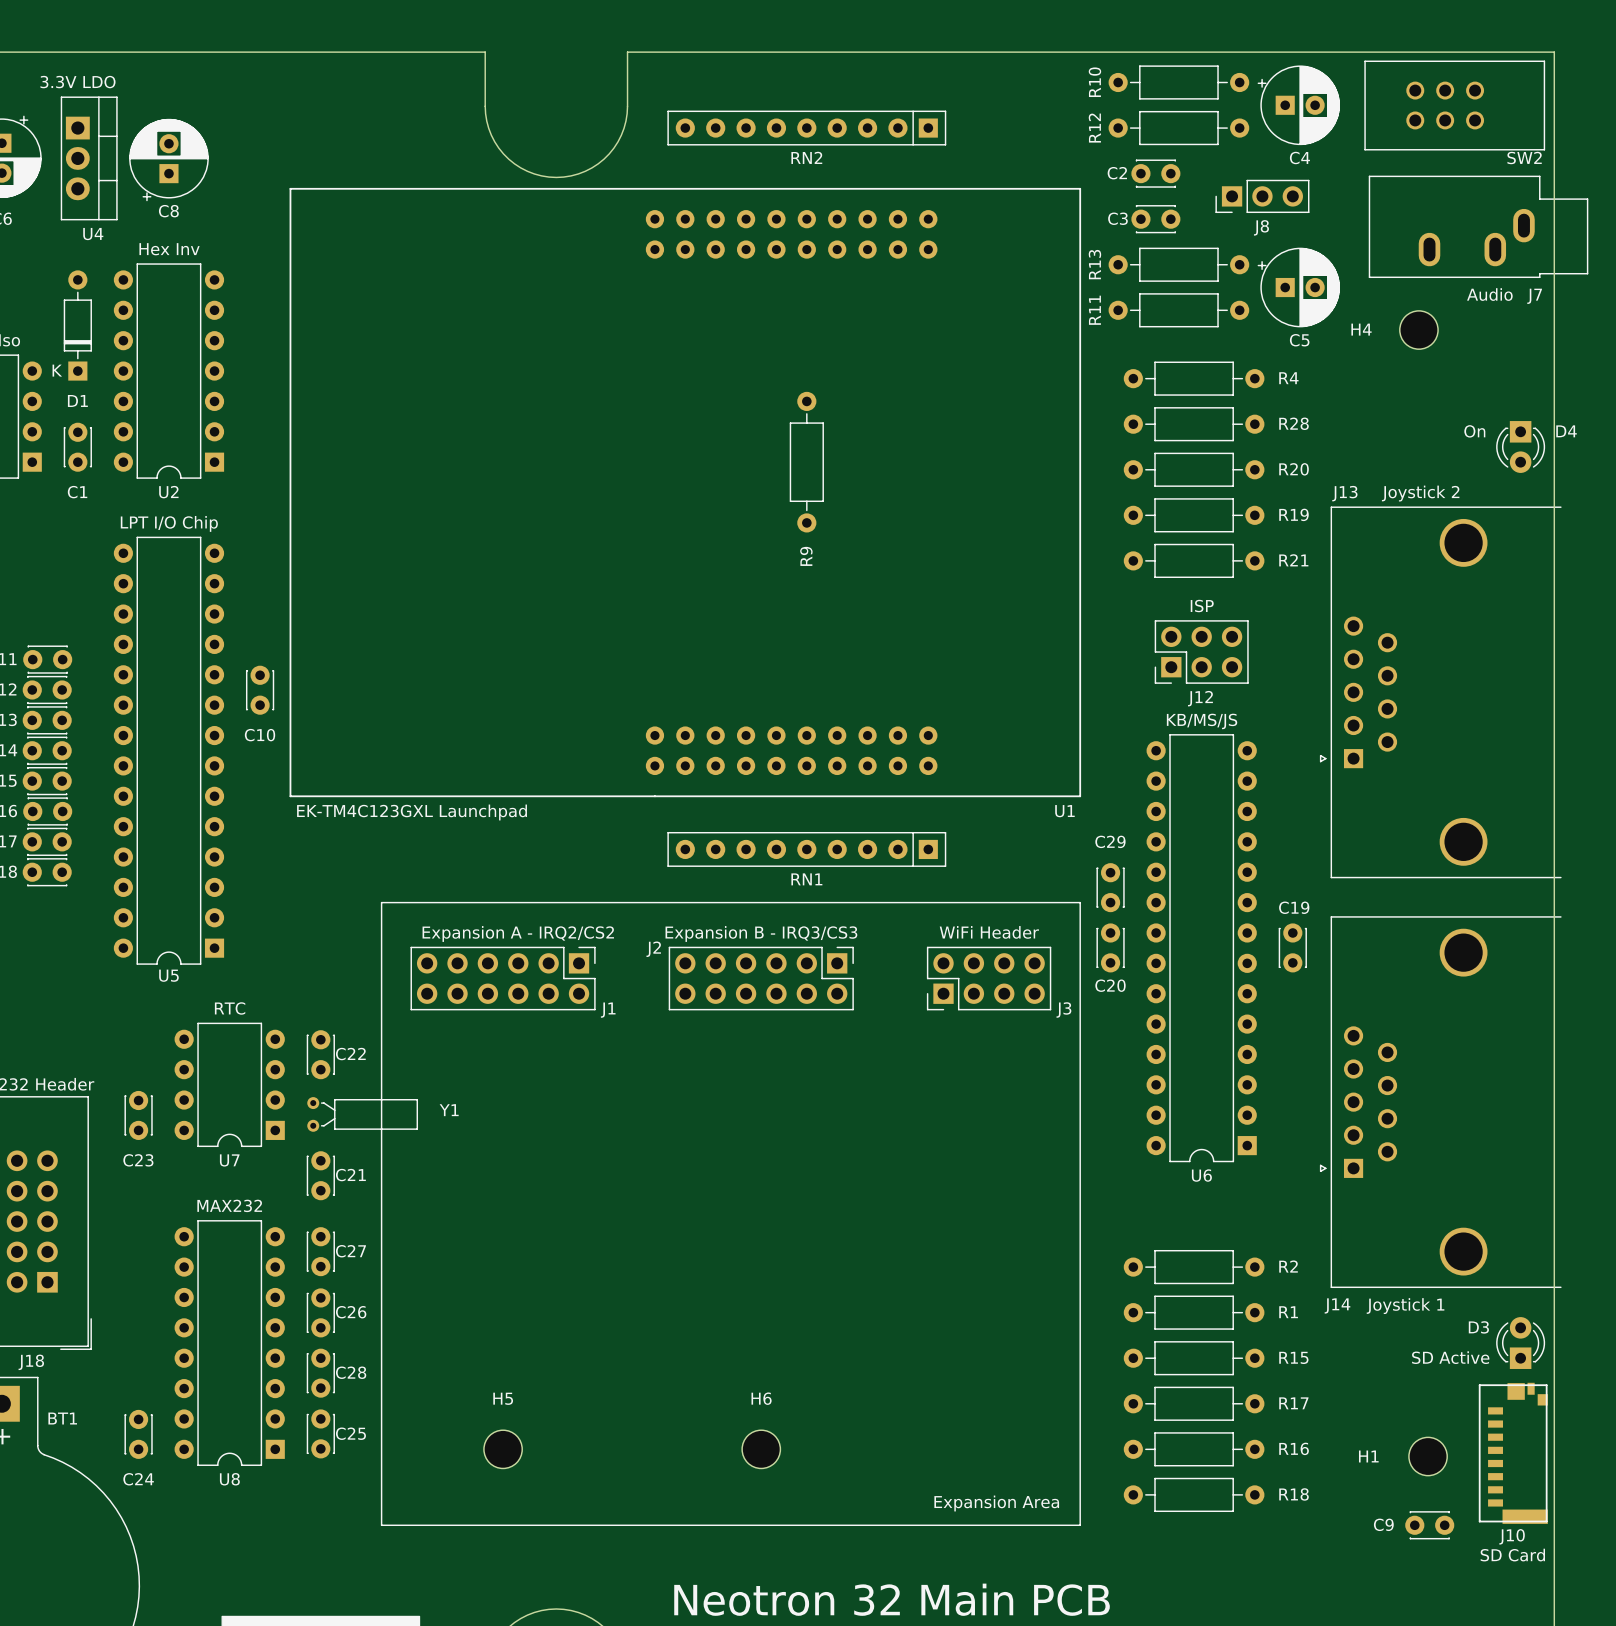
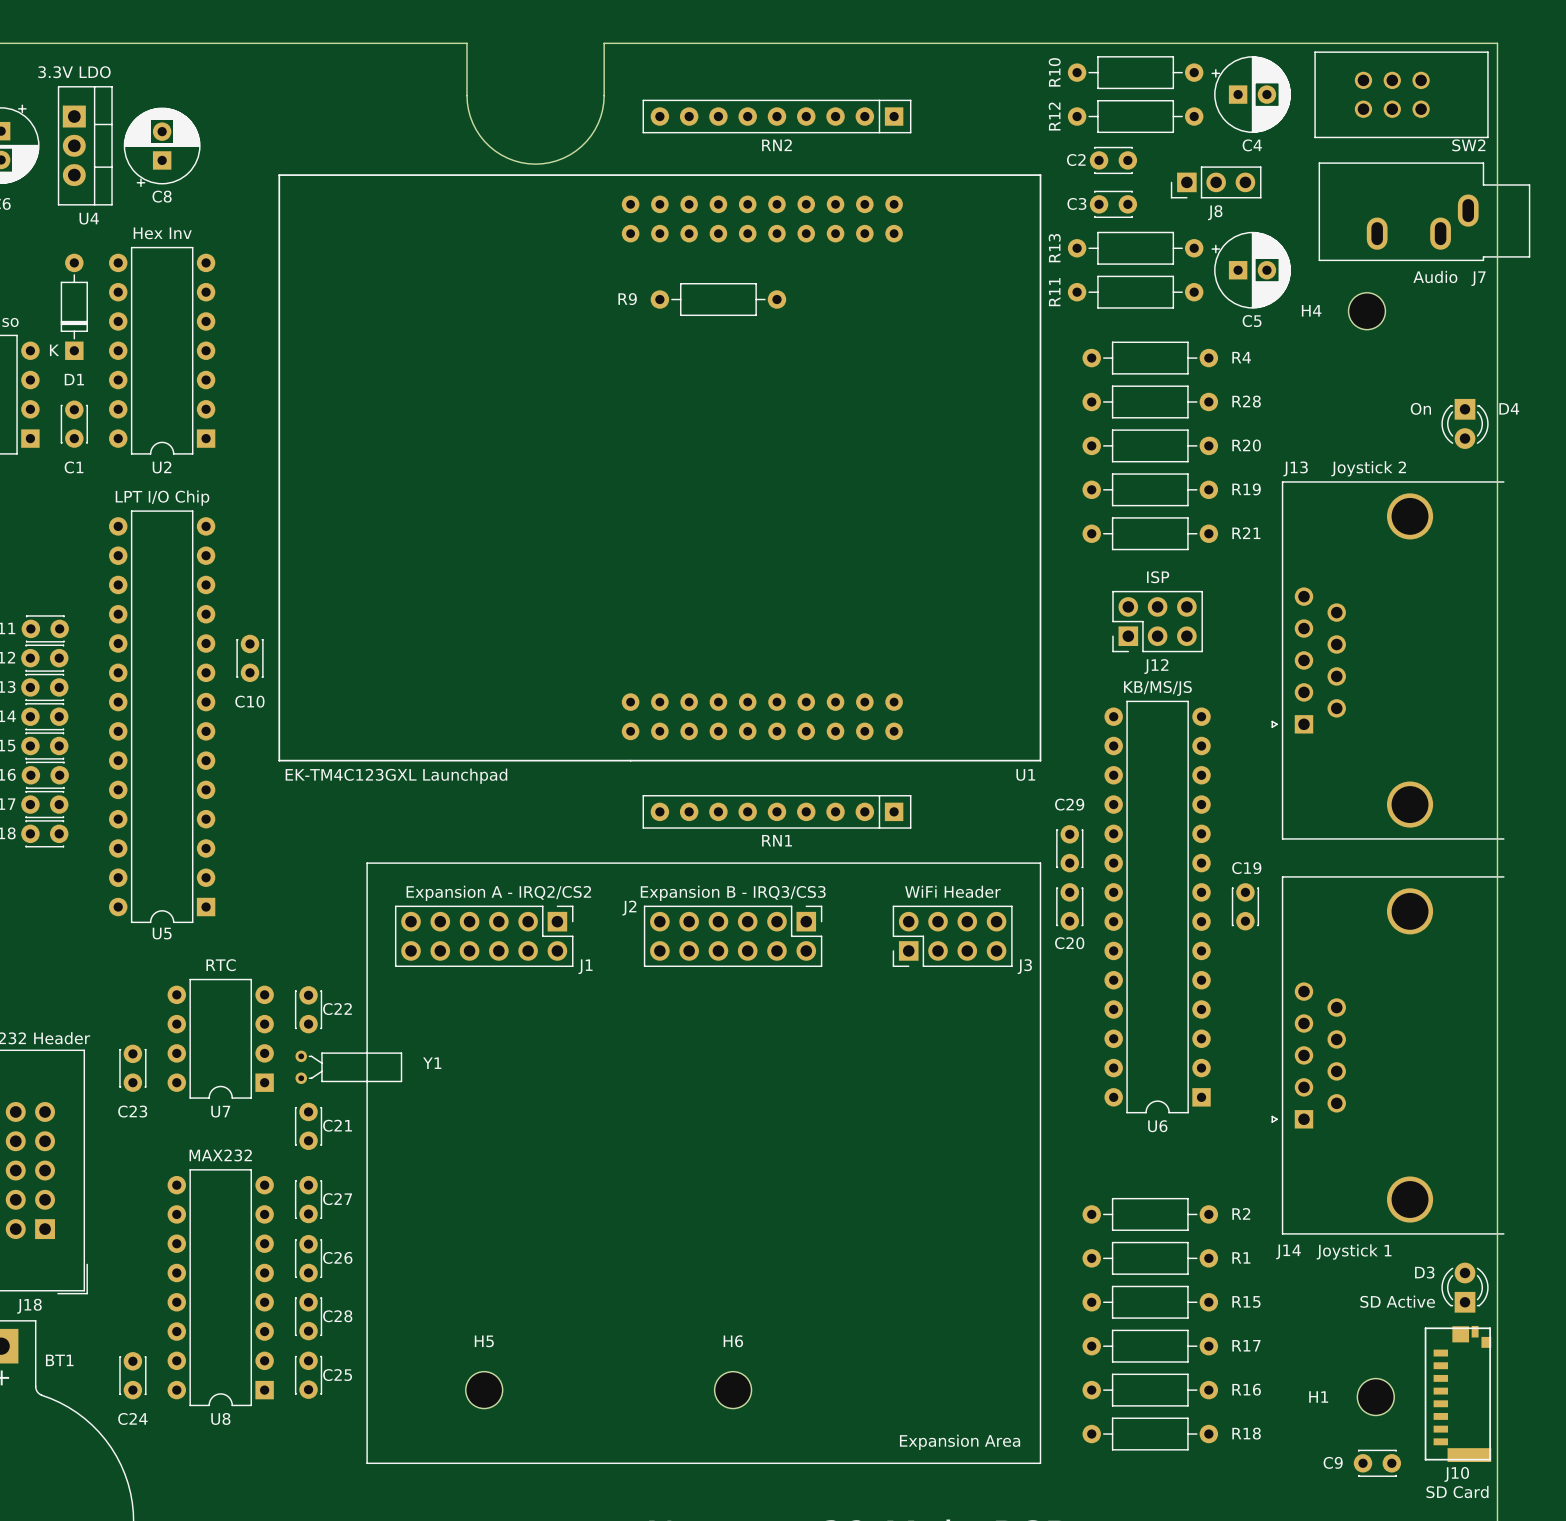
R9 rotation: 0° (806, 462) -> 90° clockwise (718, 299)
R9 position: (806, 462) -> (718, 299)

